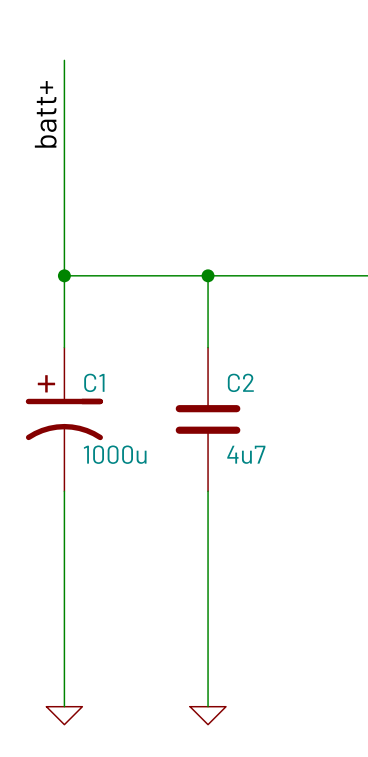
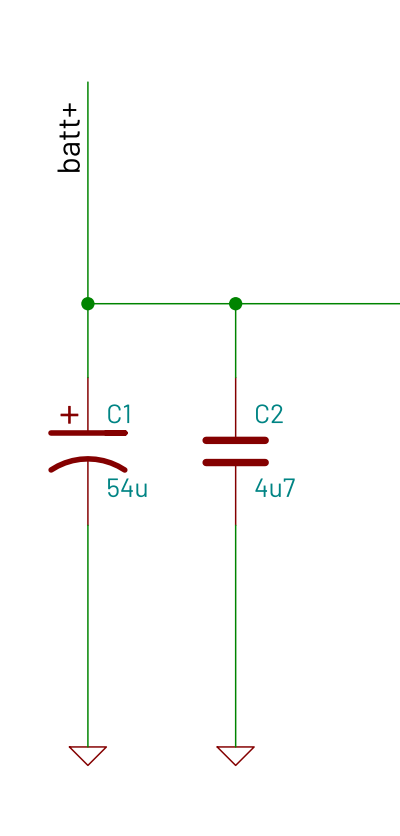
C1 value: 1000u (115, 454) -> 54u (127, 487)

